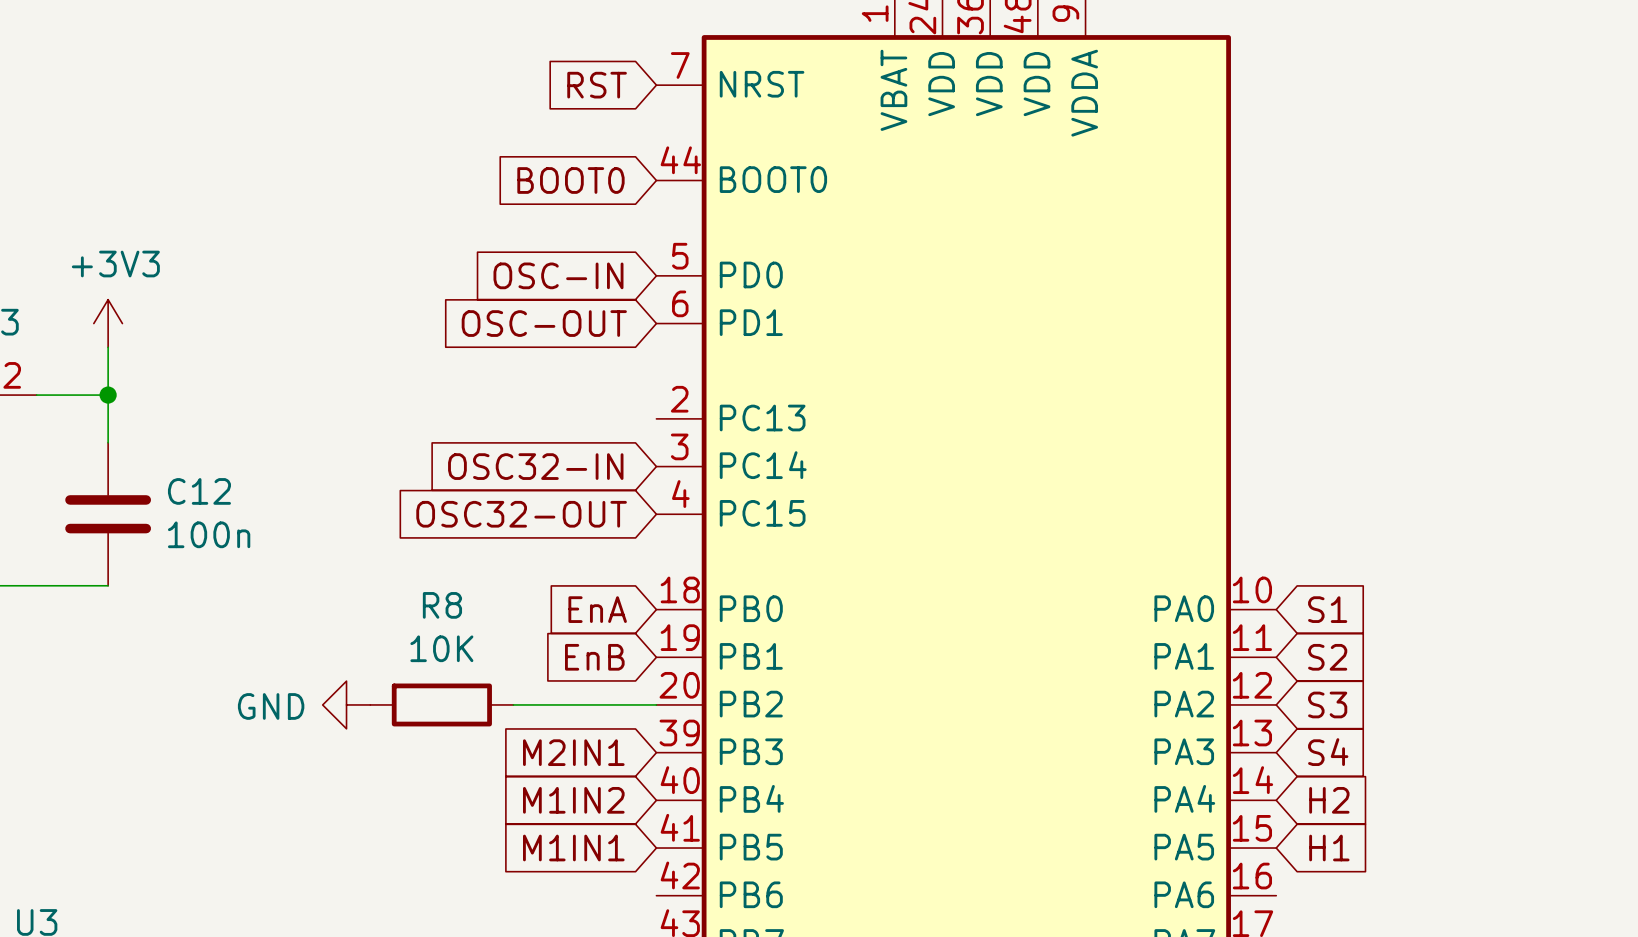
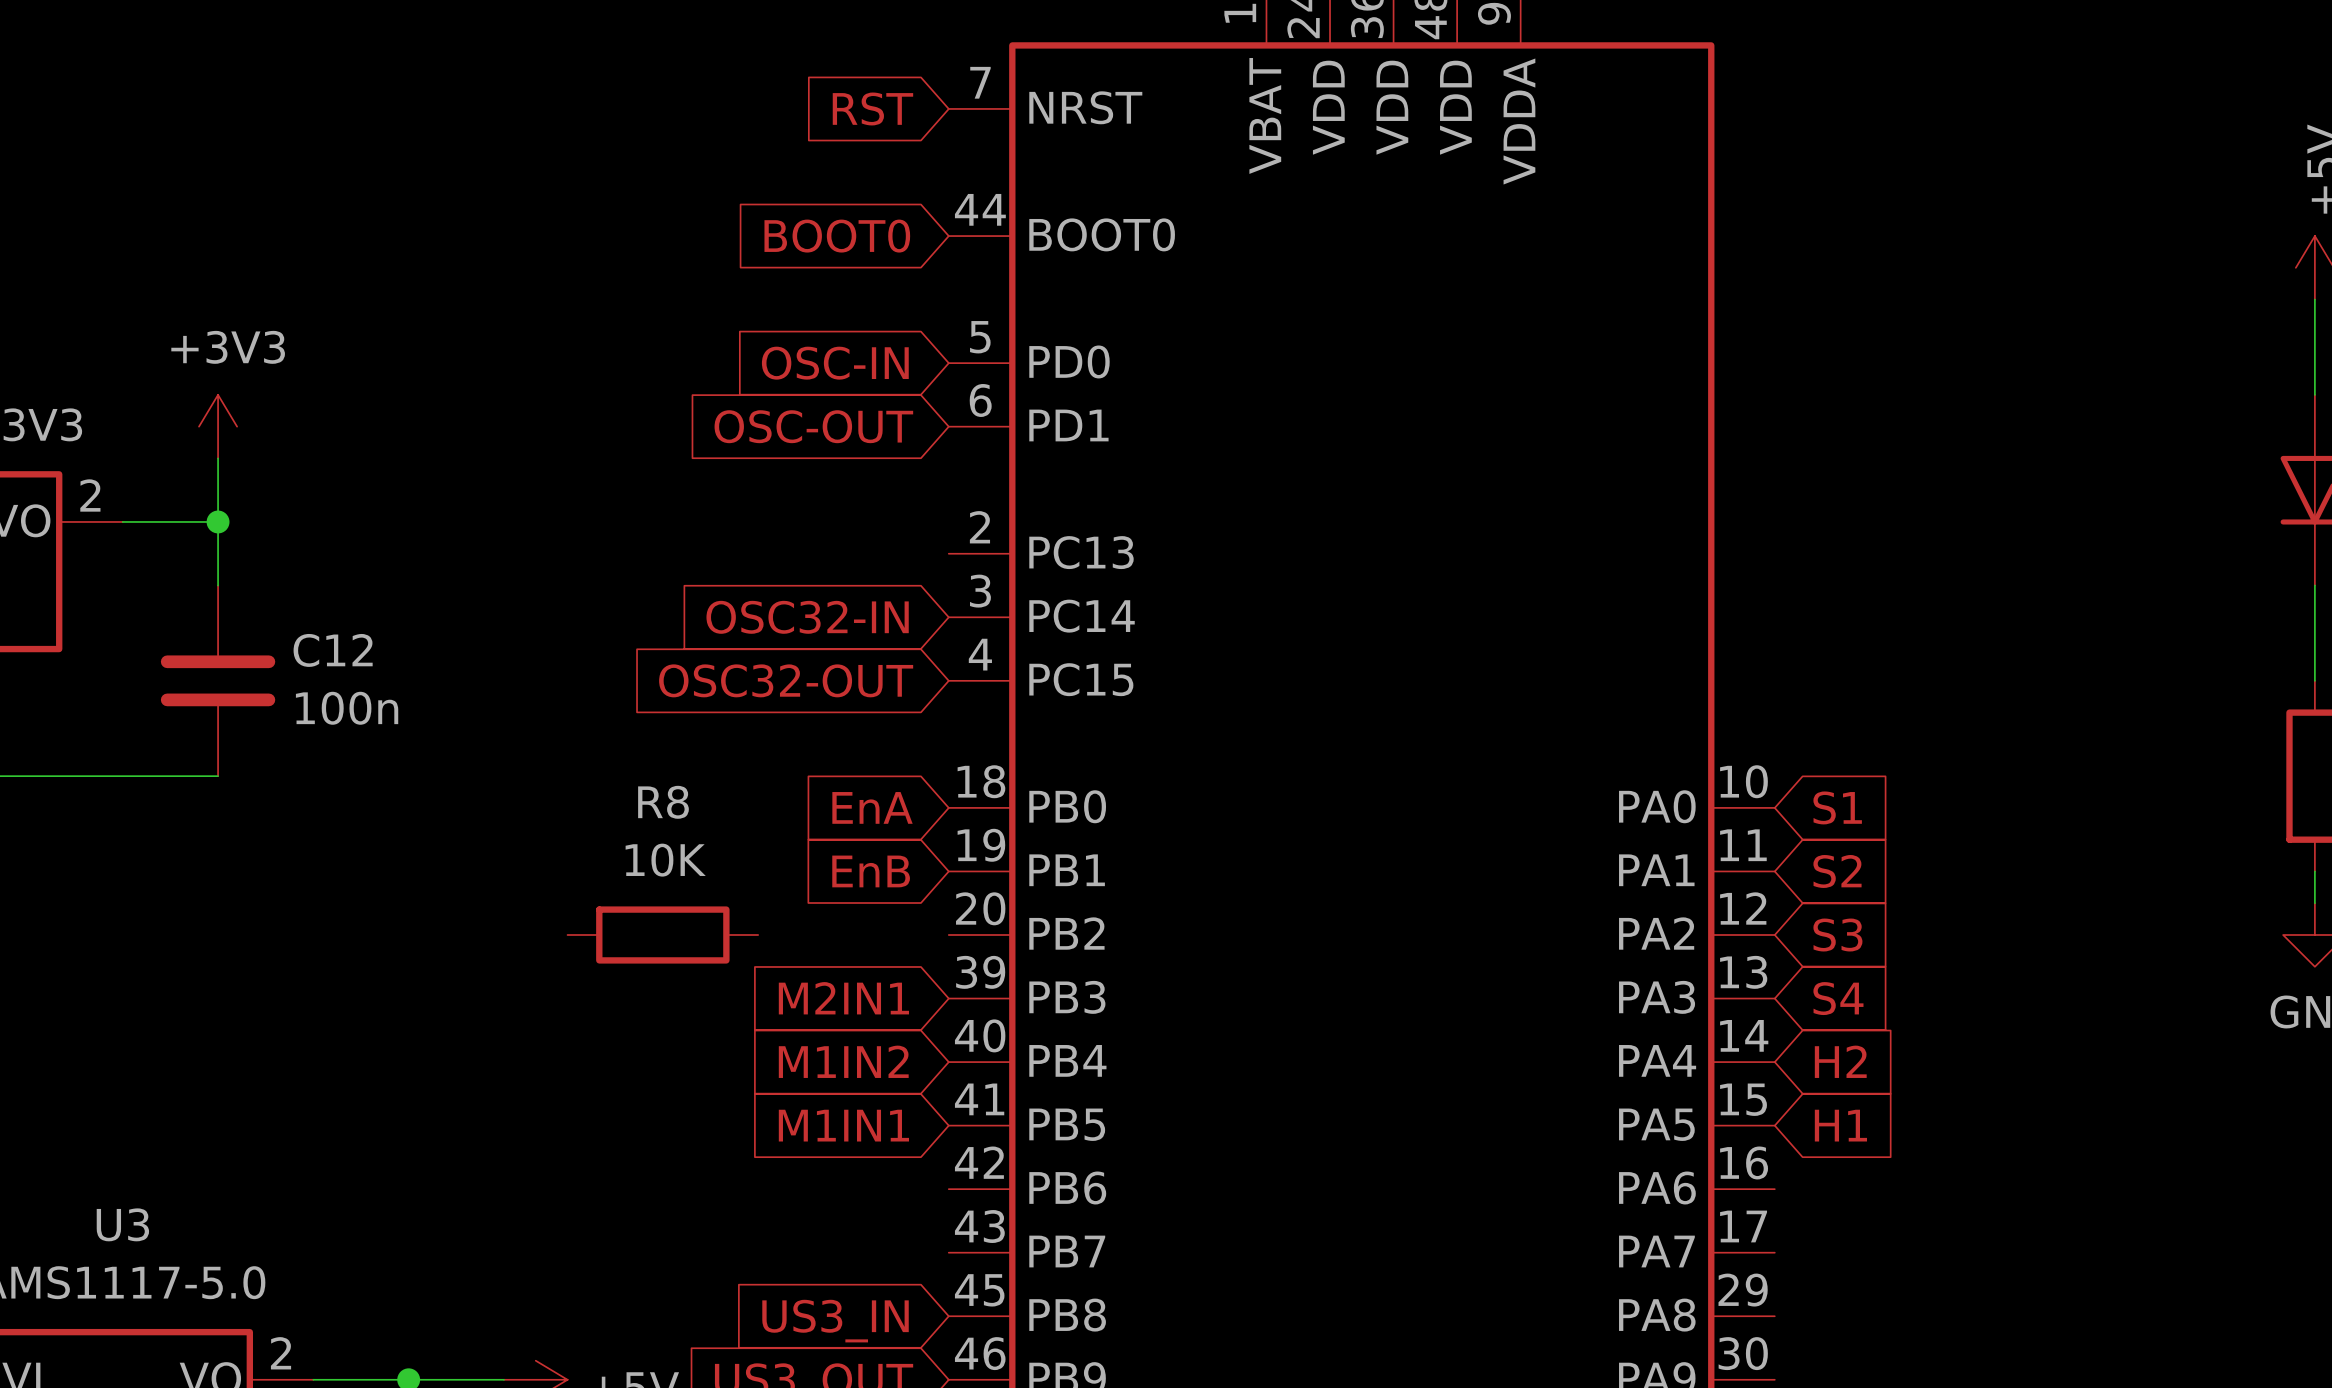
power symbol: GND (346, 704) -> none
wire: (513, 704) (656, 704) -> none

